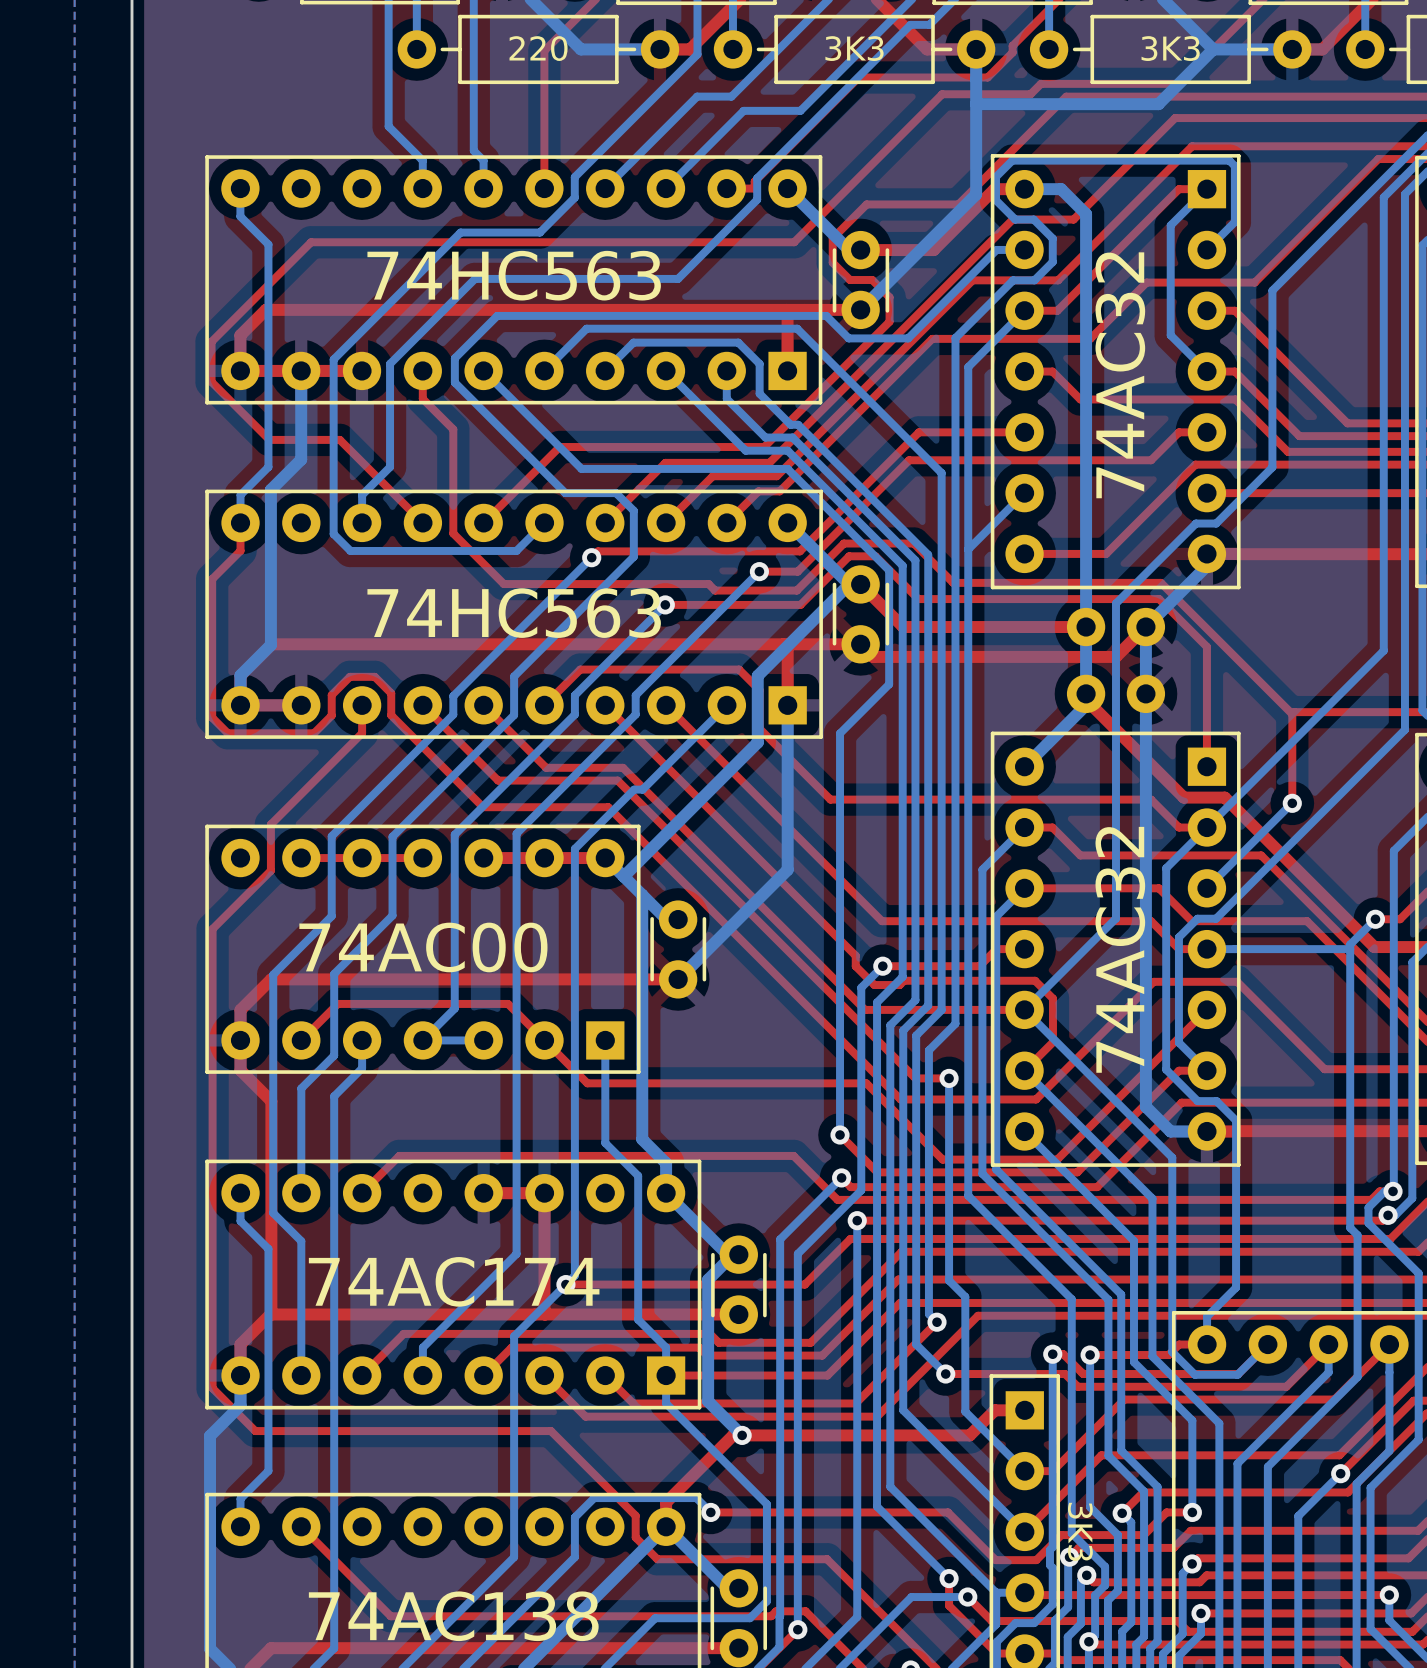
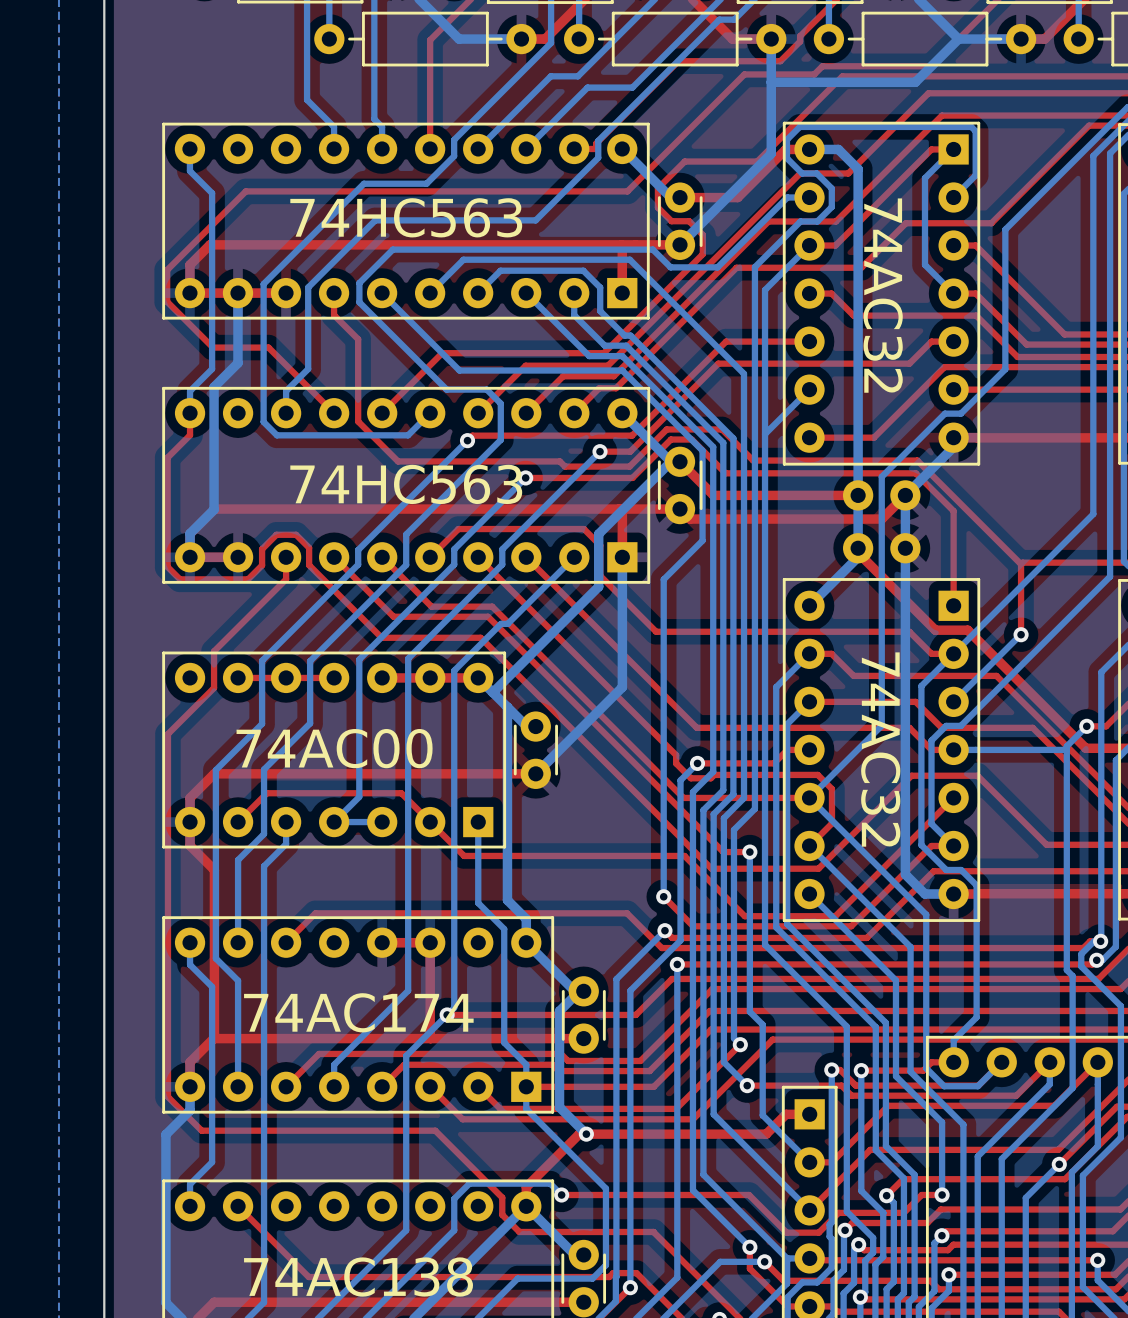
text: 220 (538, 48) -> none
text: 3K3 (854, 48) -> none
text: 3K3 (1170, 48) -> none
text rotation: 0° (1120, 375) -> 180° (883, 295)
text rotation: 0° (1120, 949) -> 180° (880, 749)
text: 3K3 (1080, 1531) -> none

